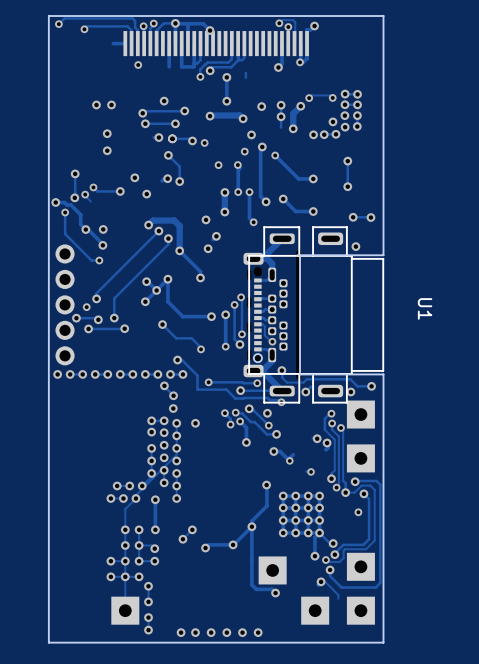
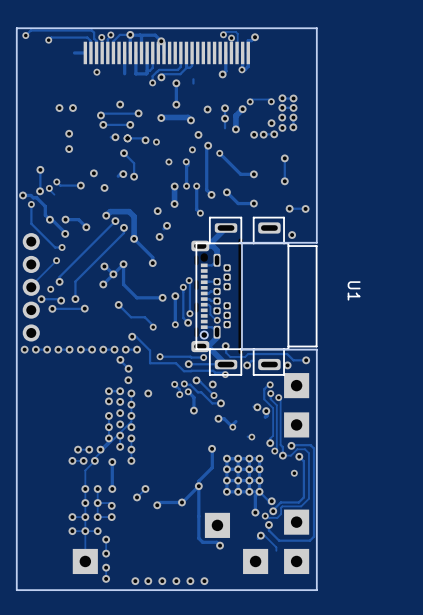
track: none -> (65, 219) (78, 219) (86, 227)
via: none -> (86, 227)
track: none -> (56, 260) (31, 285) (32, 287)
via: none -> (56, 260)

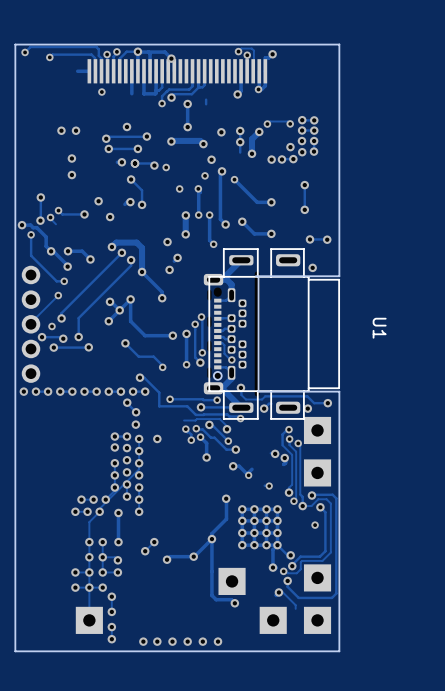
track: none -> (184, 420) (219, 419) (226, 426)

